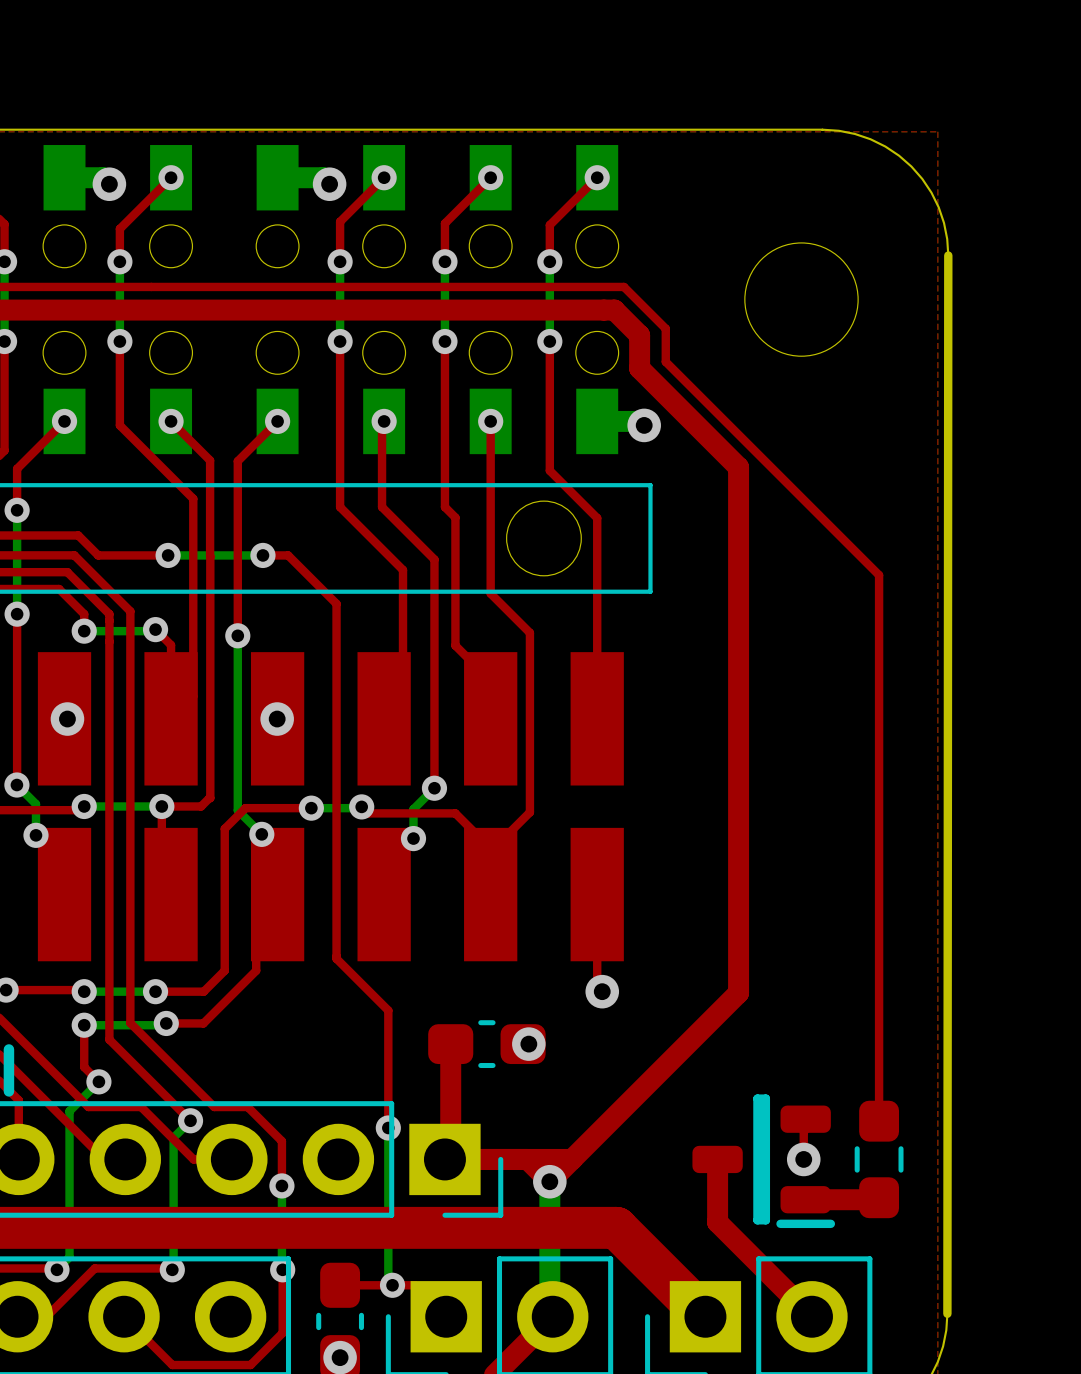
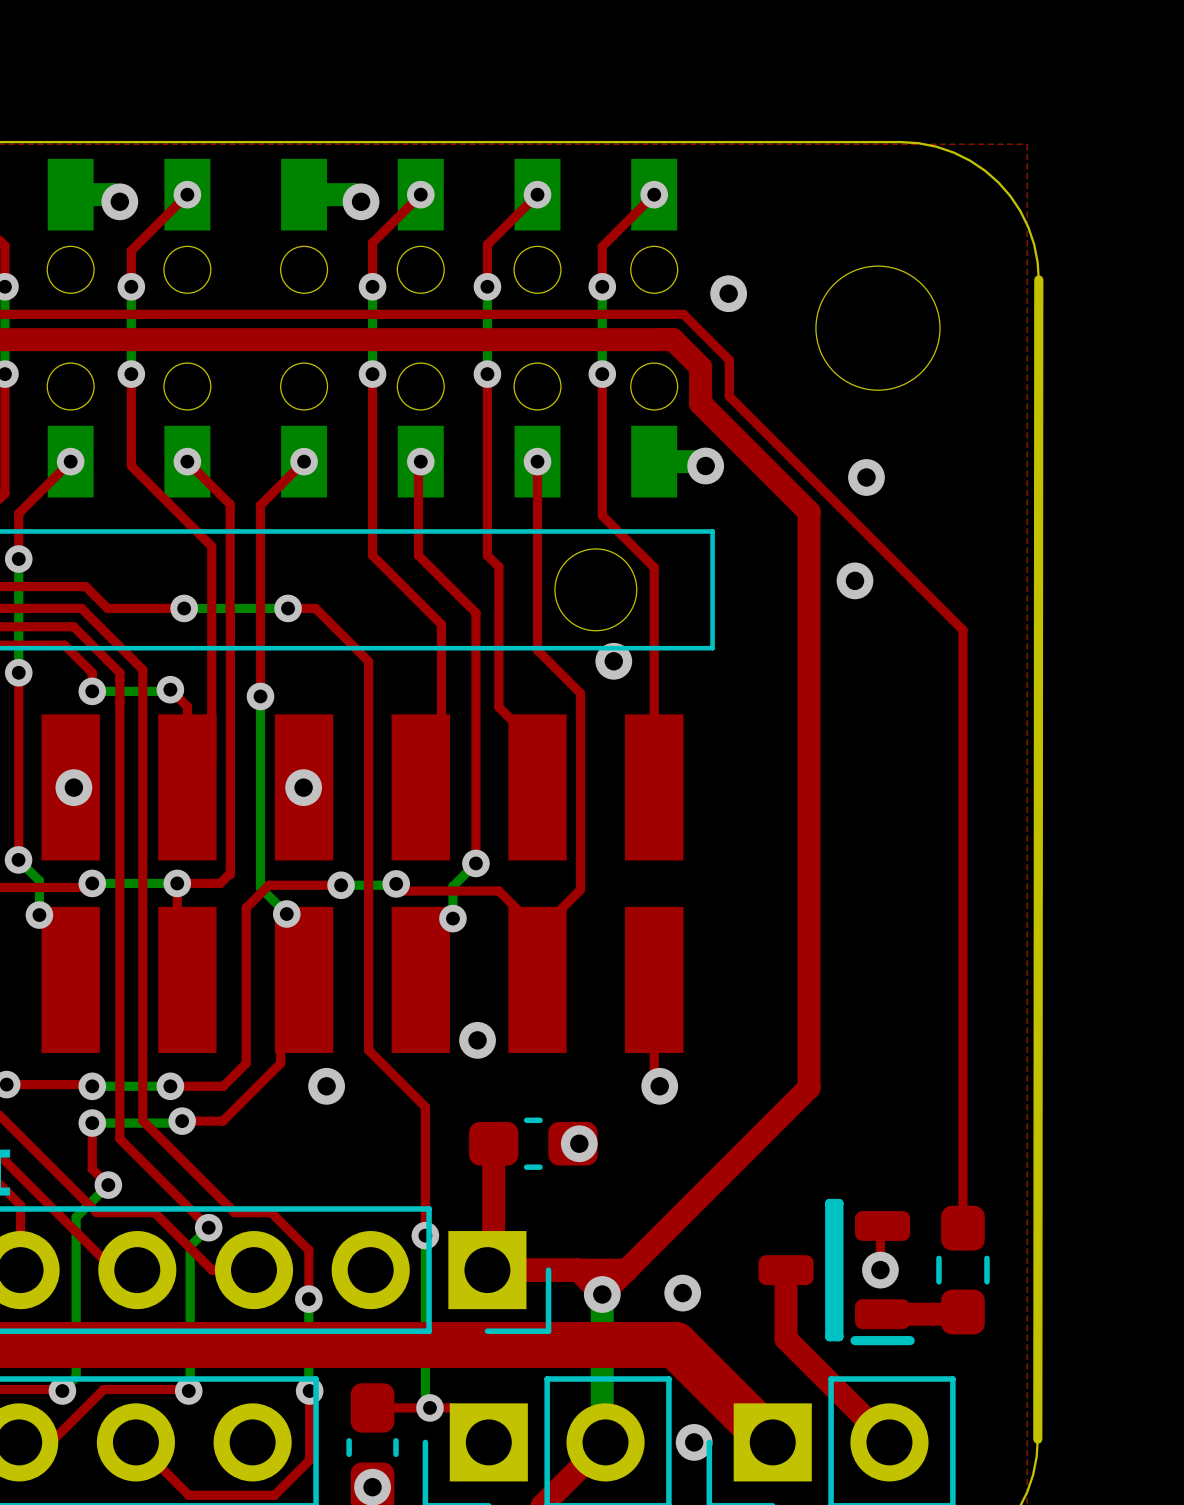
via: none -> (728, 293)
via: none -> (866, 477)
via: none -> (855, 580)
via: none -> (613, 661)
via: none -> (477, 1040)
via: none -> (326, 1086)
via: none -> (682, 1293)
via: none -> (694, 1442)

